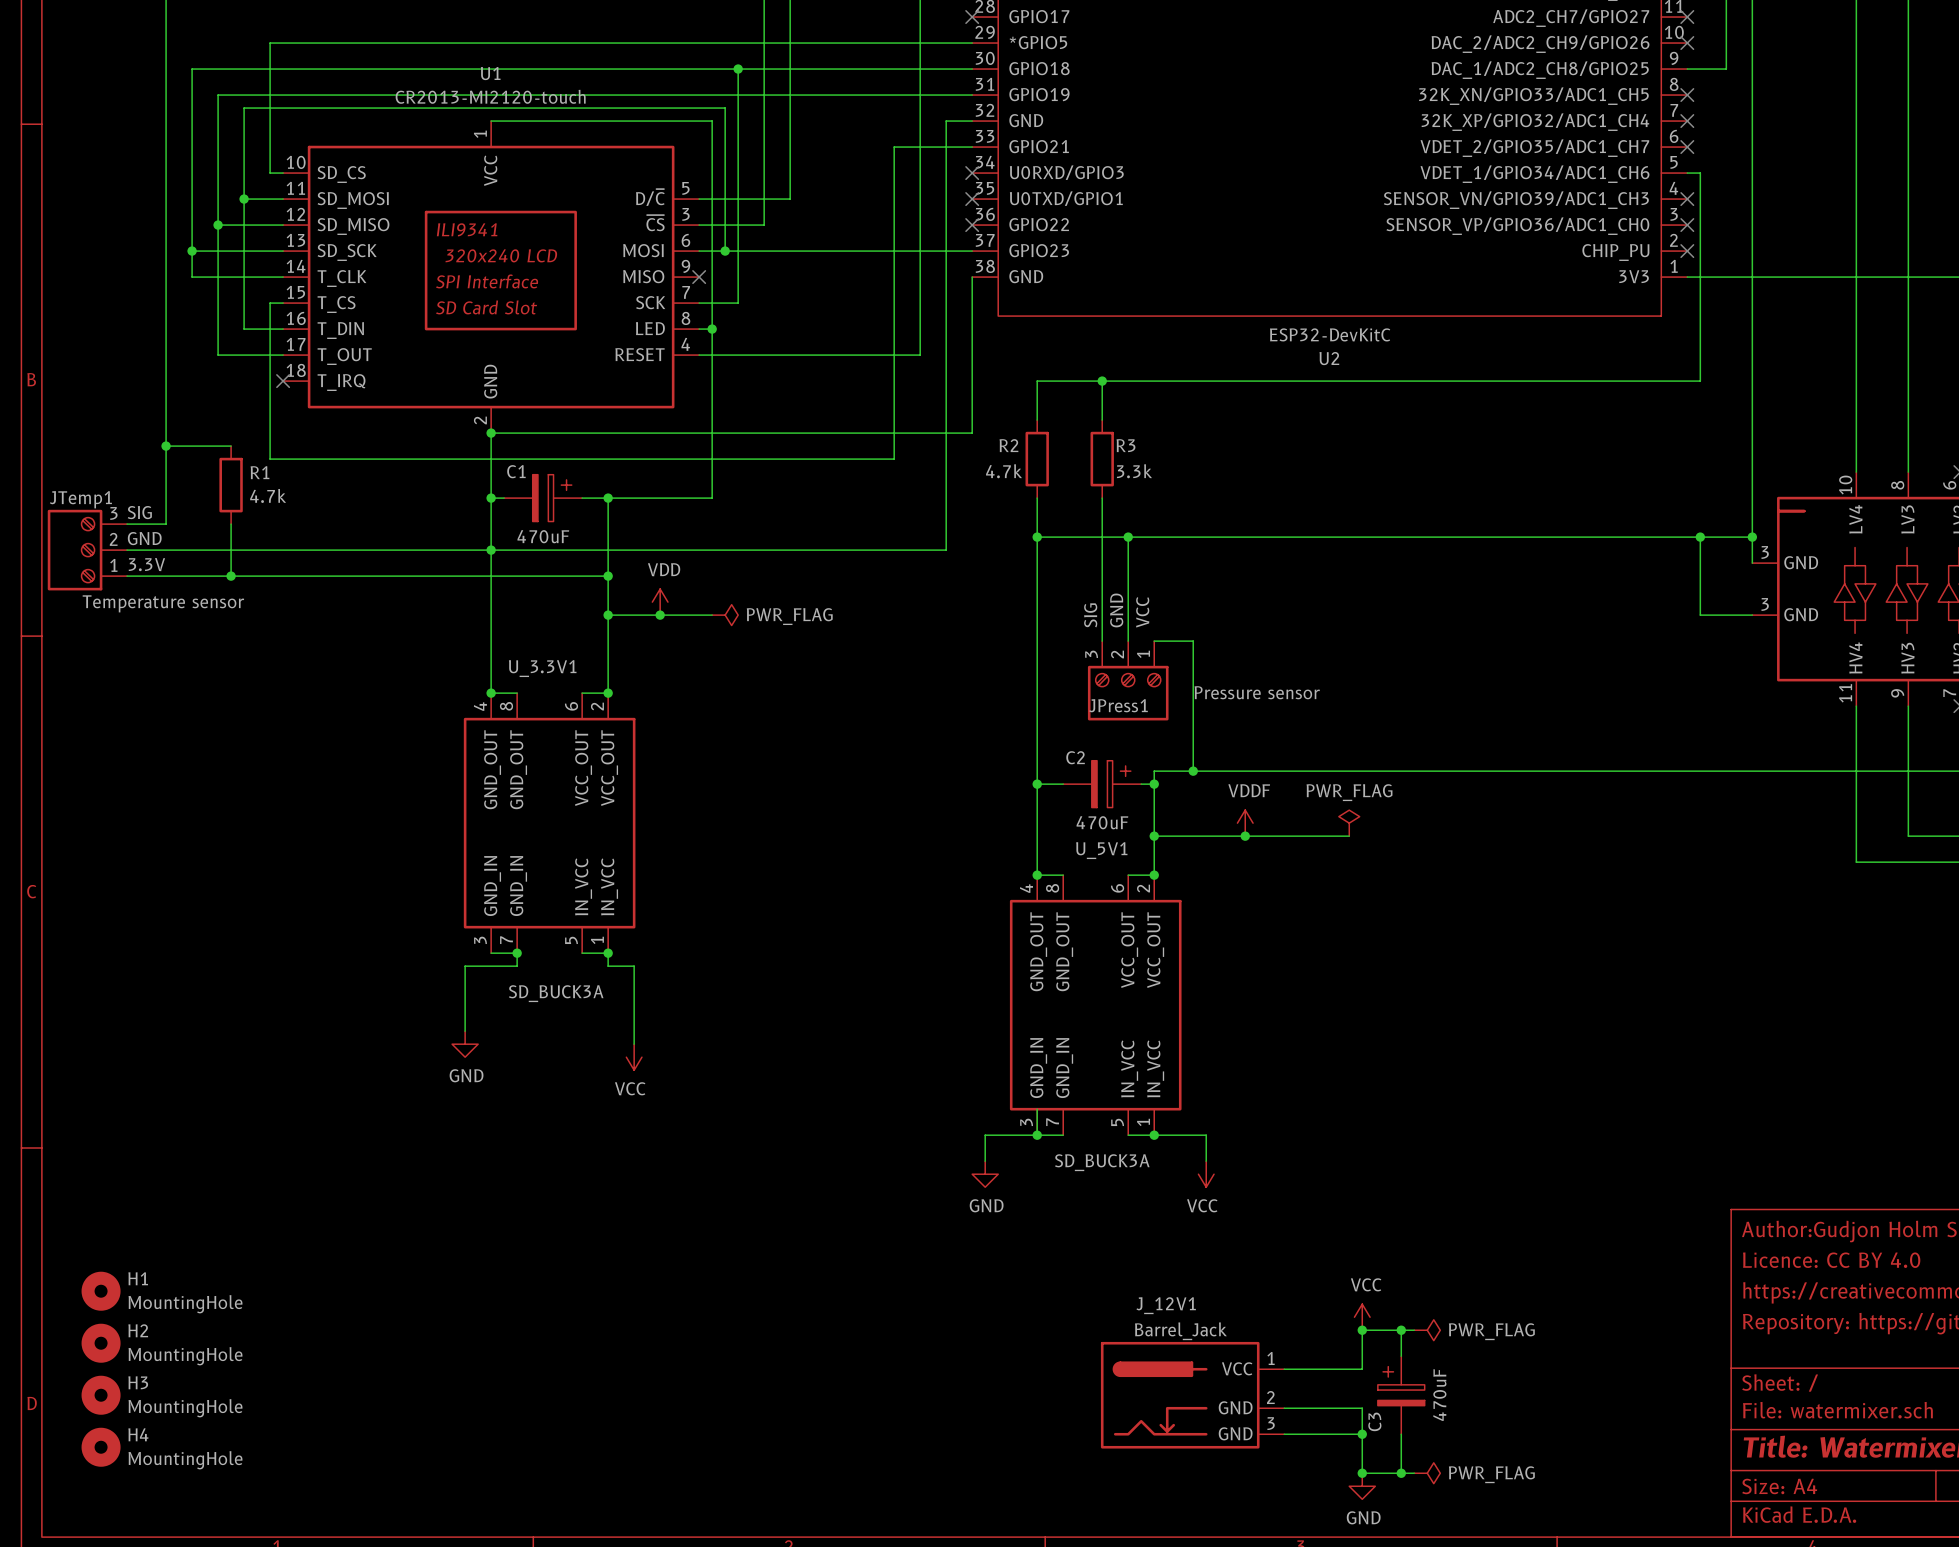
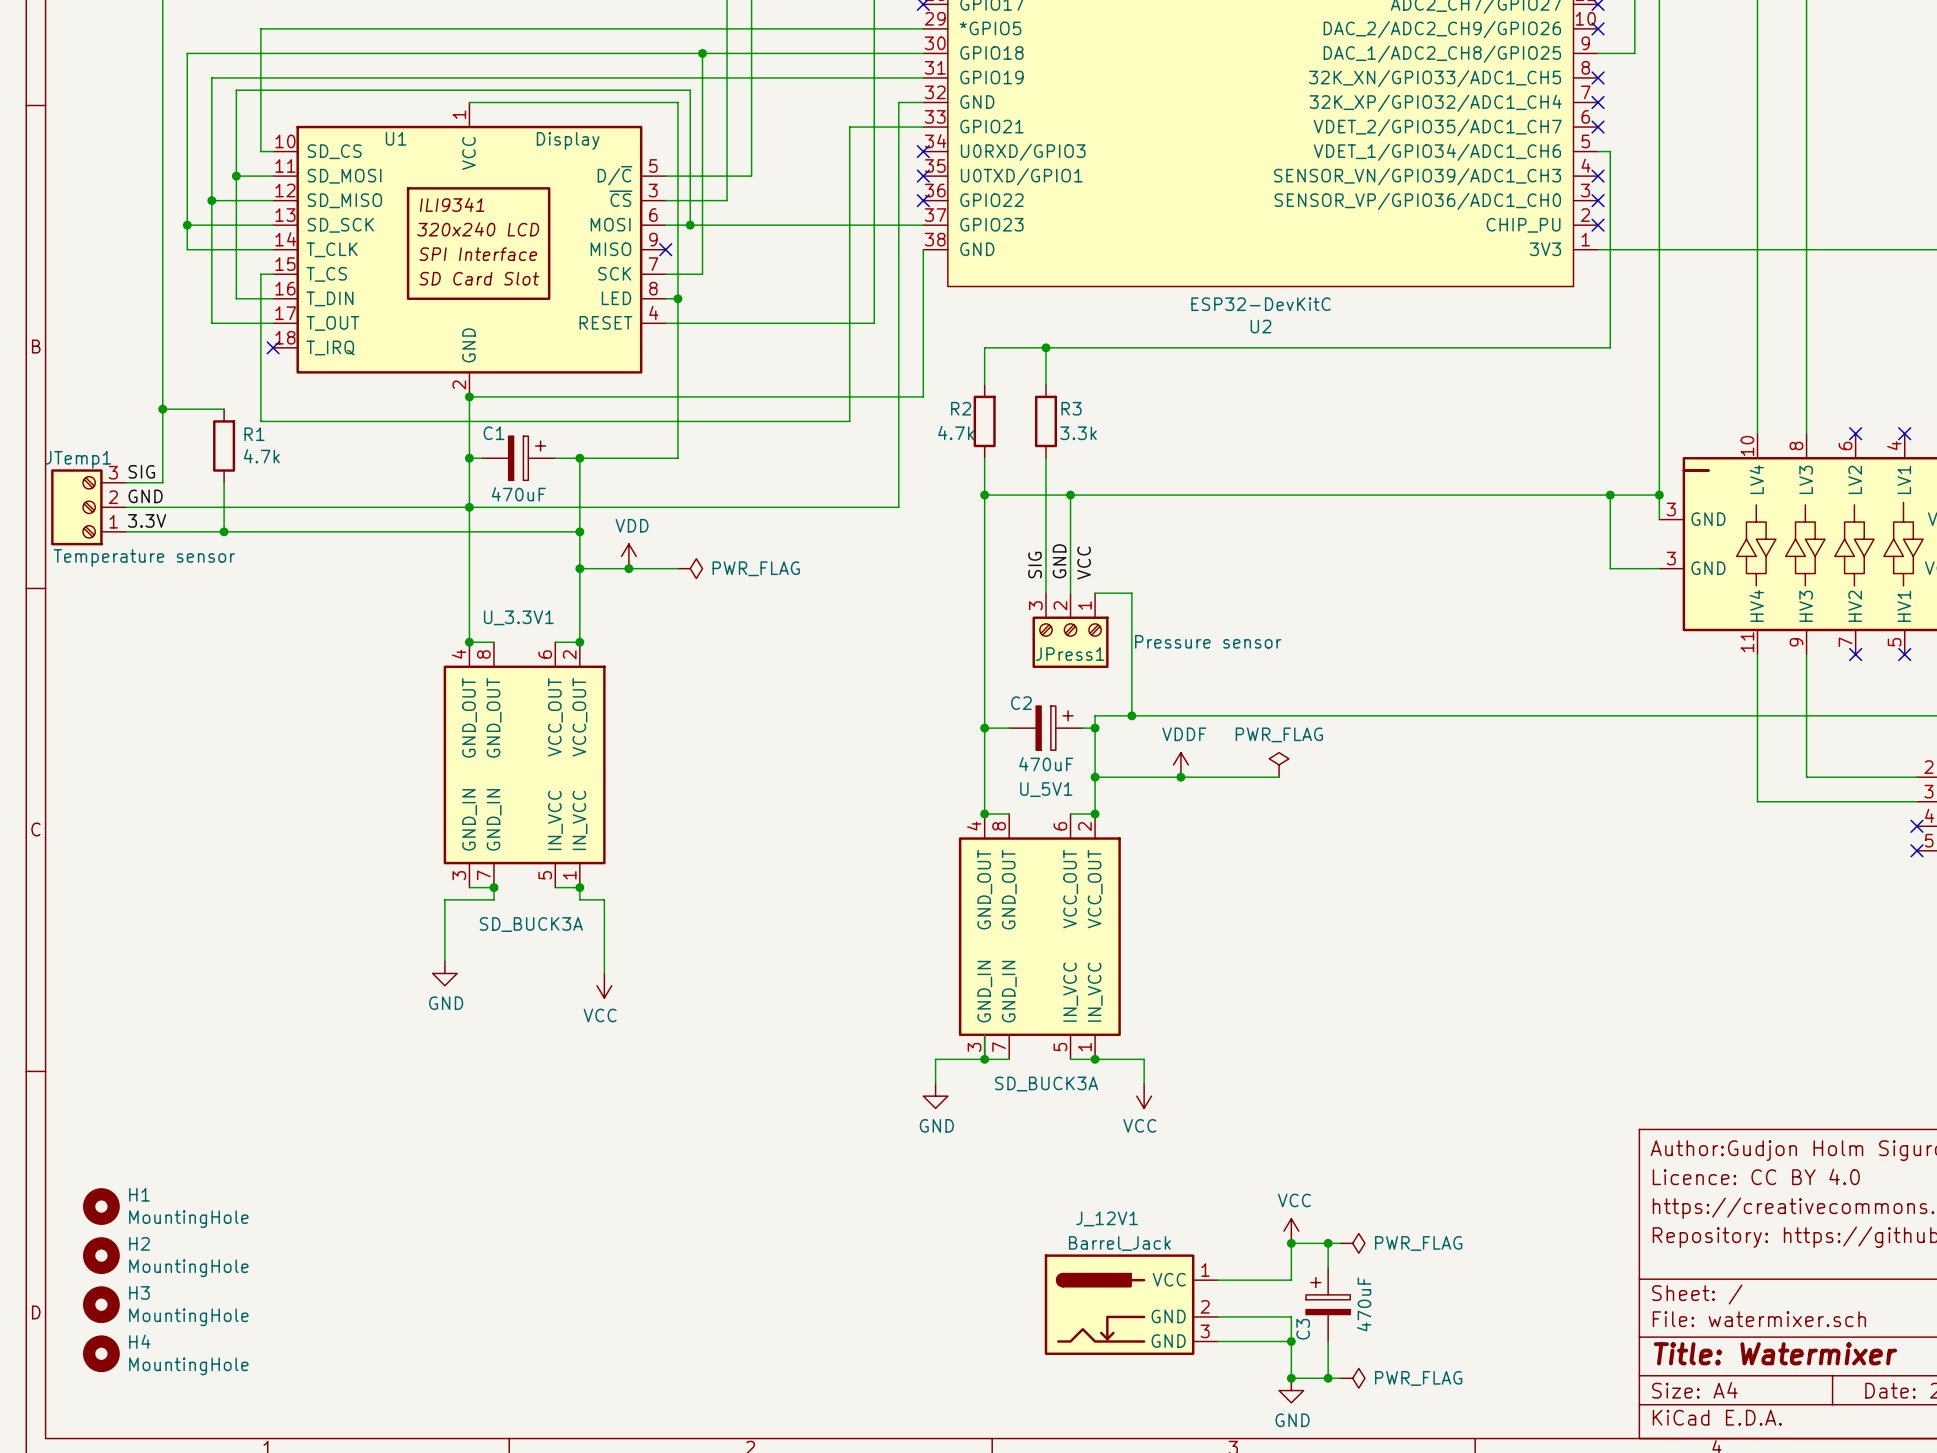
U1 name position: U1 (490, 73) -> U1 (396, 138)
U1 value: CR2013-MI2120-touch (490, 96) -> Display (568, 140)

